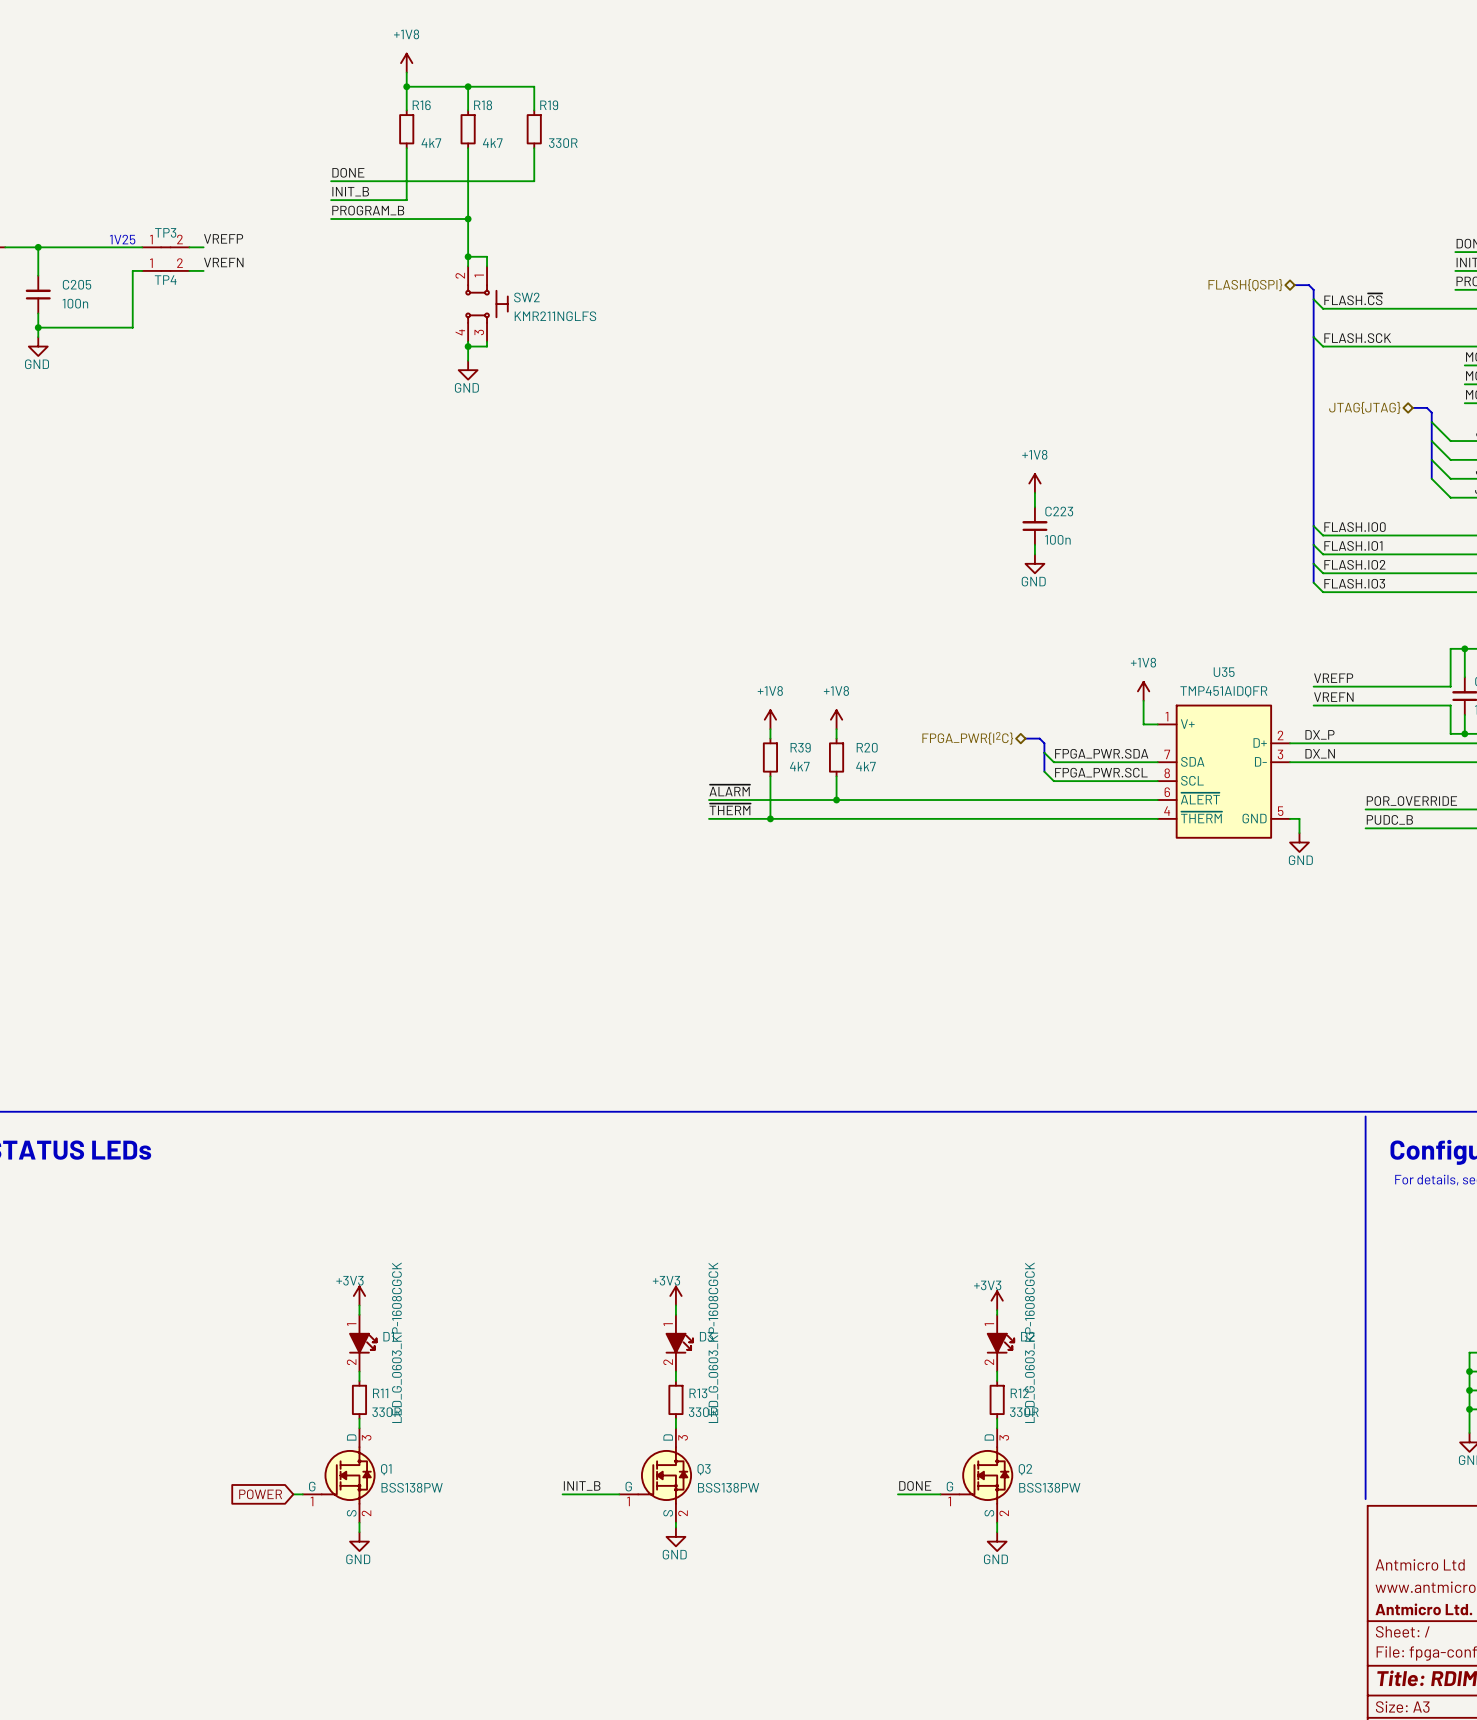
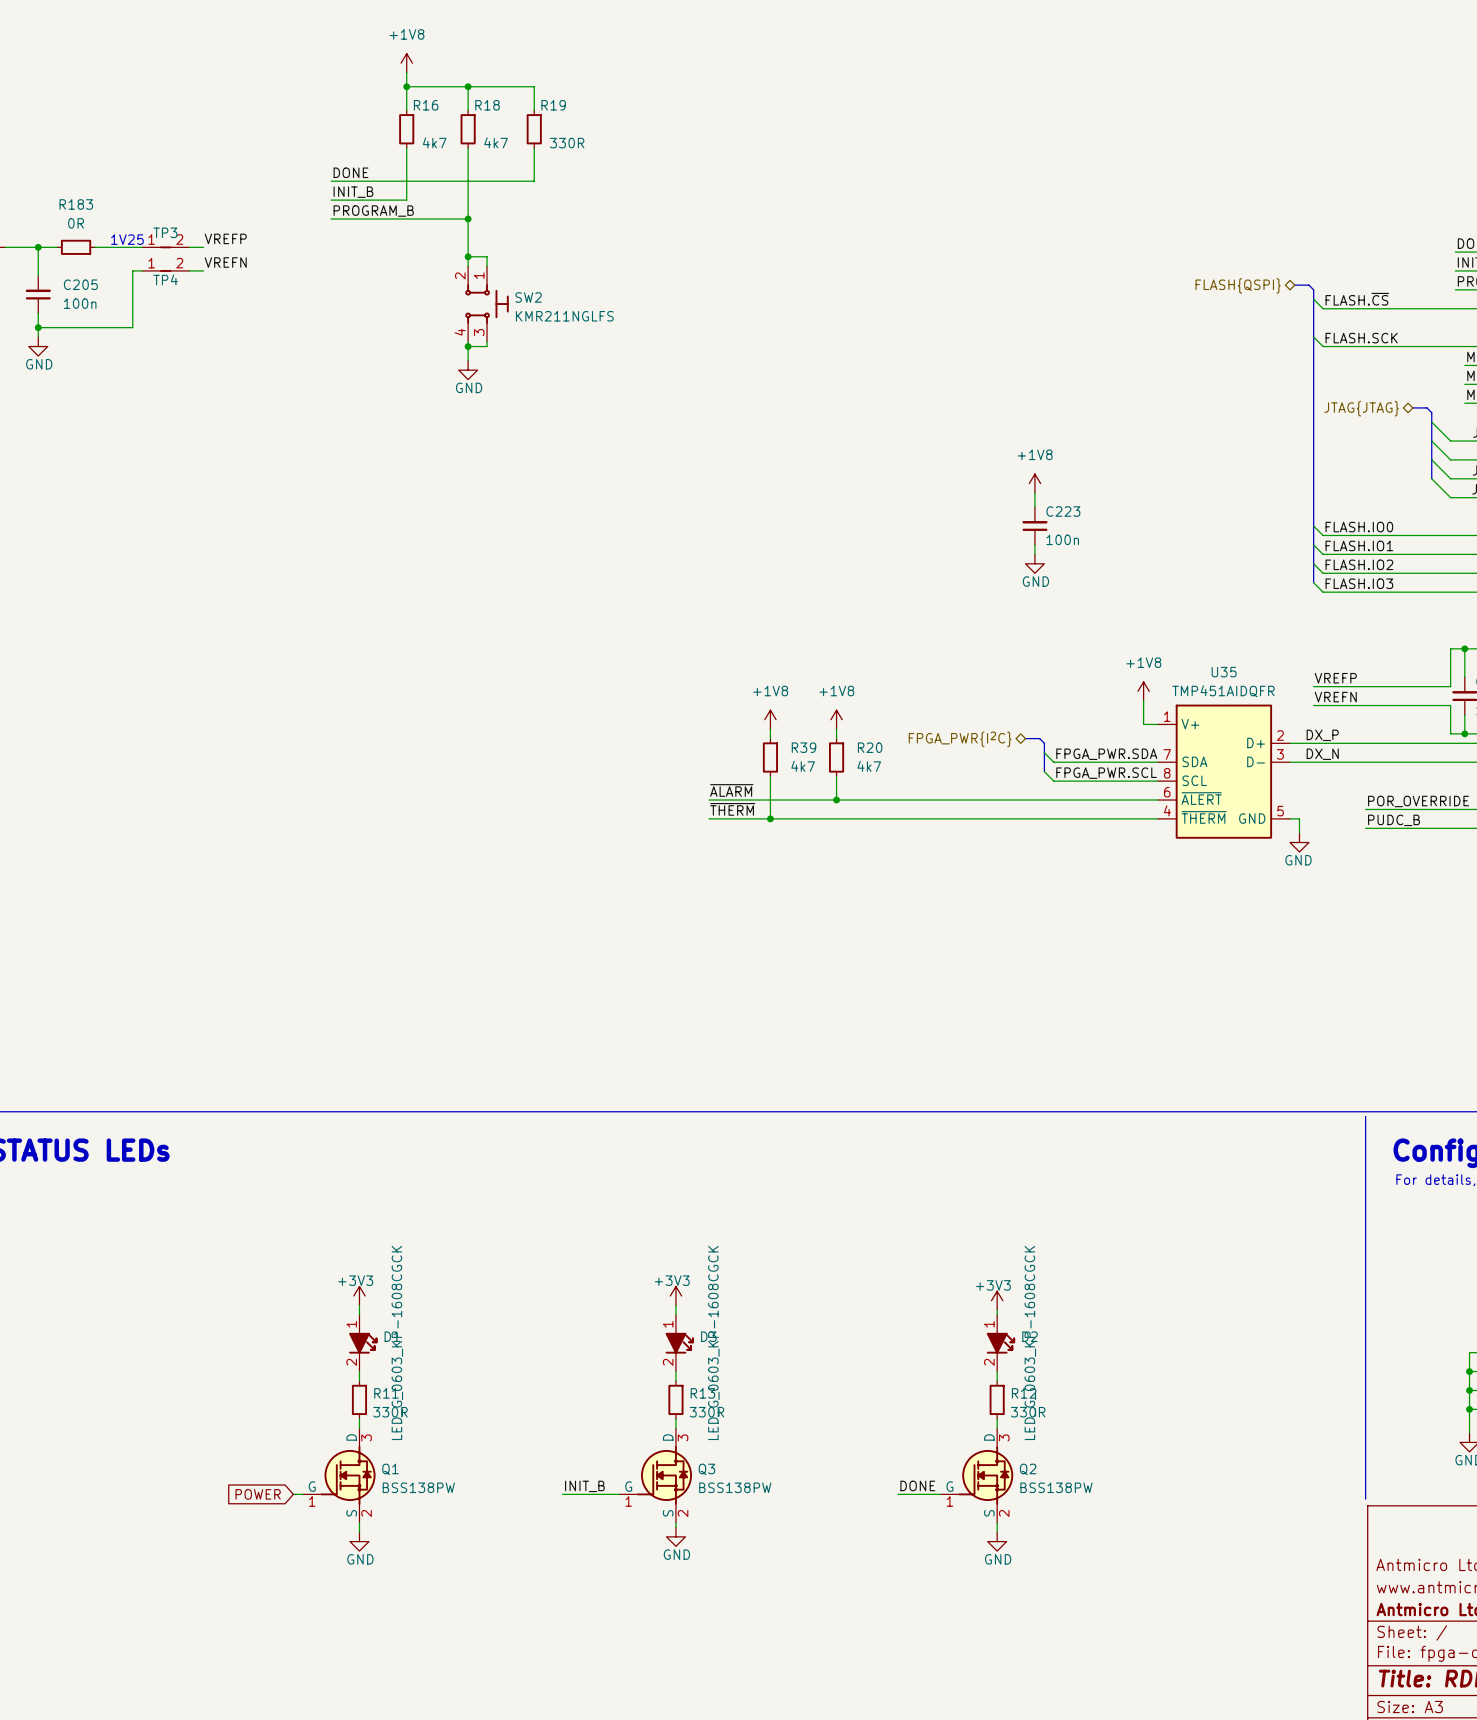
wire: (57, 247) (94, 247) -> none
R183: none -> (76, 247)

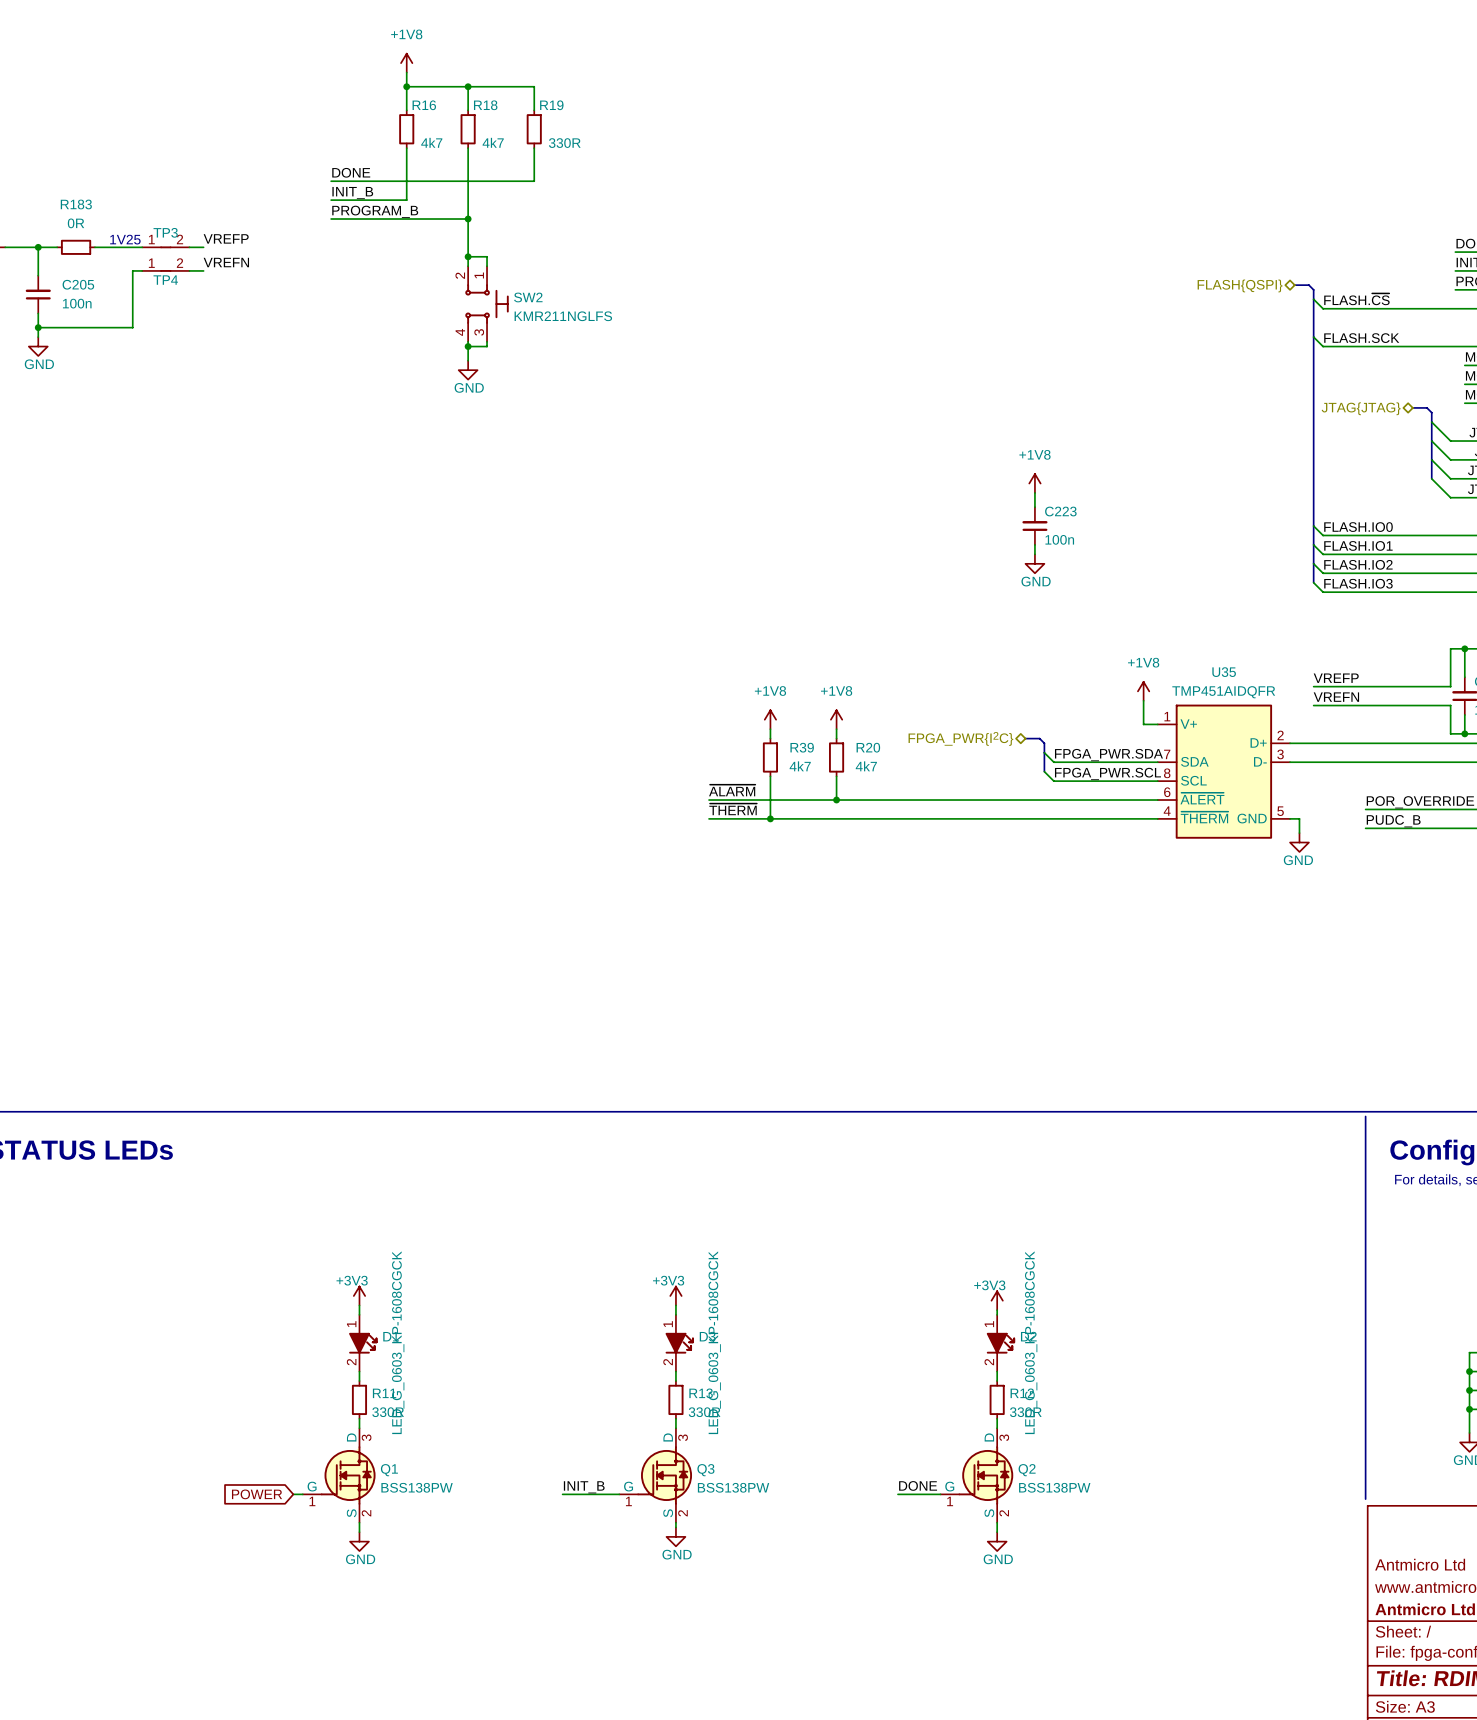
label: DX_P (1322, 735) -> none
label: DX_N (1322, 754) -> none

